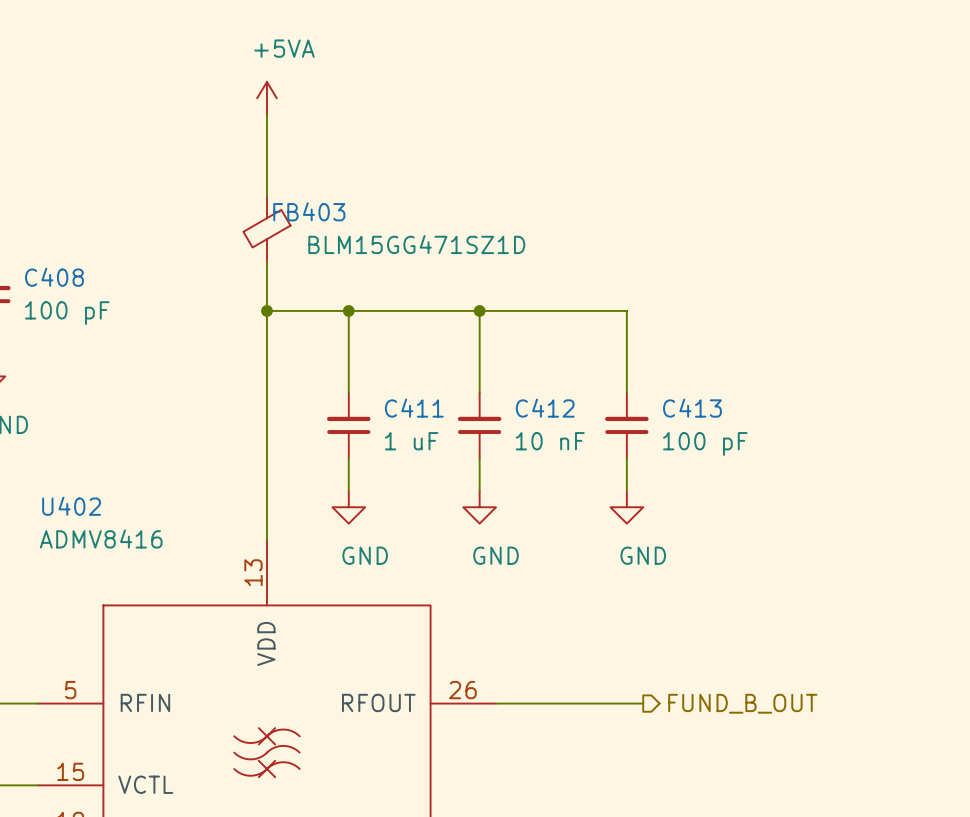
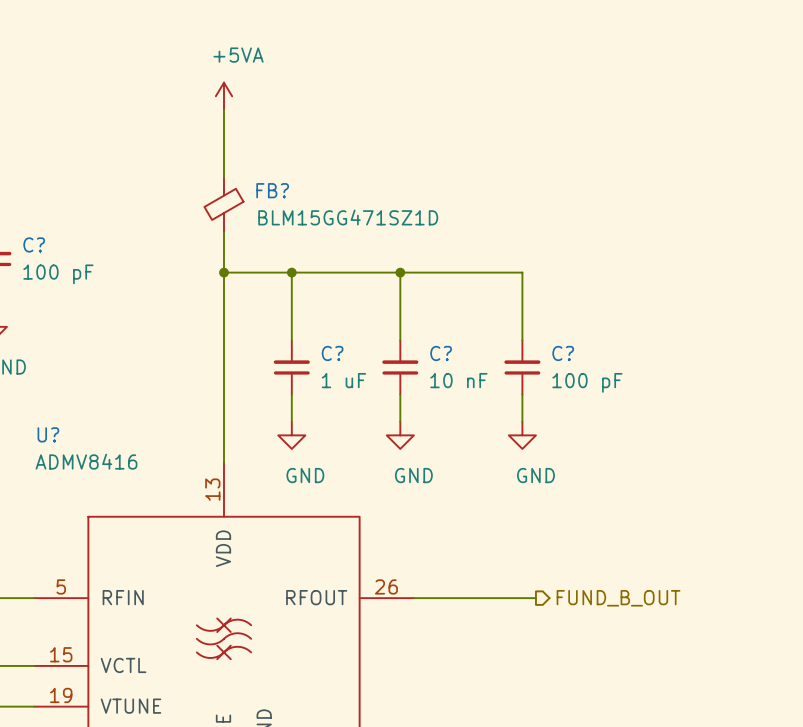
FB403 name: FB403 (309, 211) -> FB? (272, 190)
C408 name: C408 (54, 277) -> C? (34, 244)
C411 name: C411 (414, 408) -> C? (332, 353)
C412 name: C412 (545, 408) -> C? (441, 353)
C413 name: C413 (692, 408) -> C? (563, 353)
U402 name: U402 (71, 506) -> U? (48, 434)

